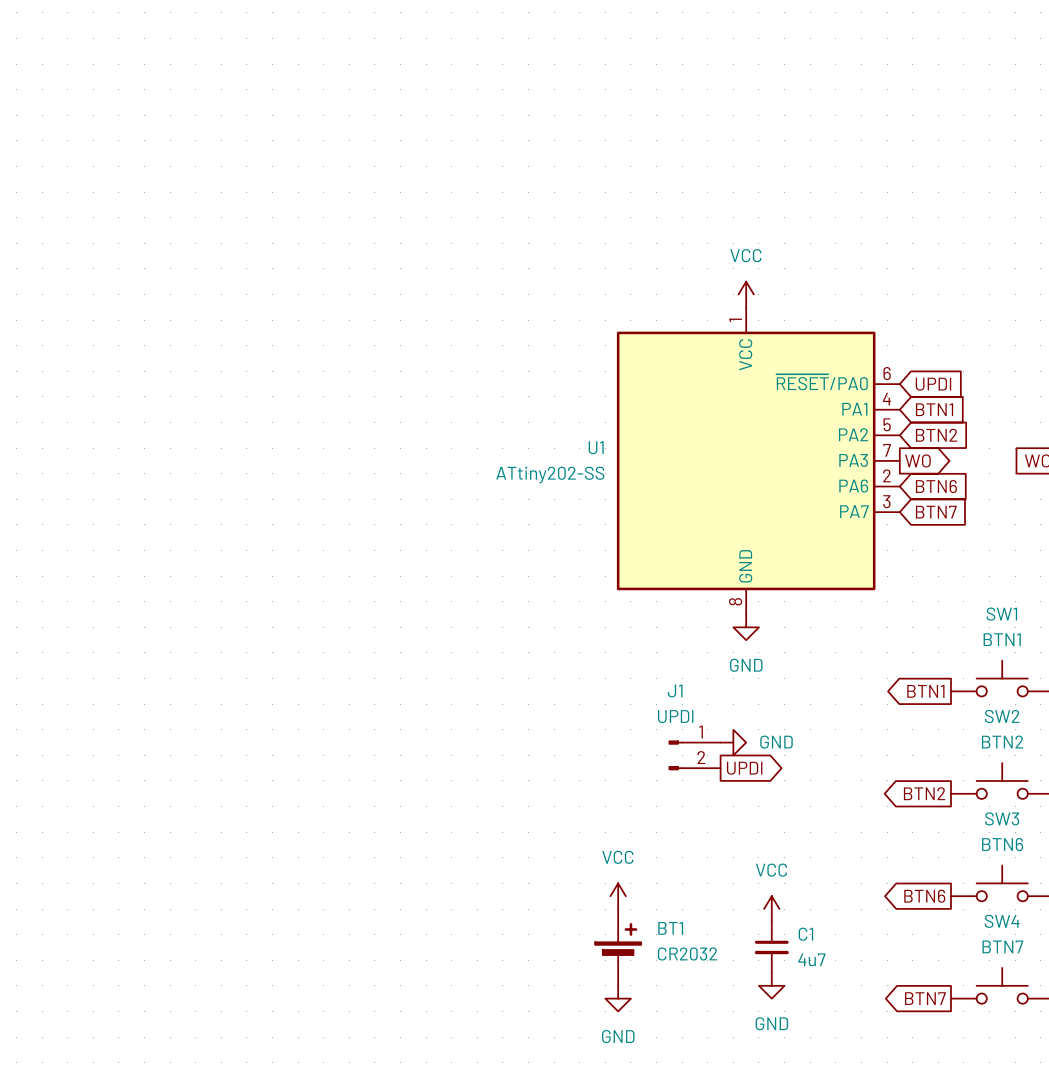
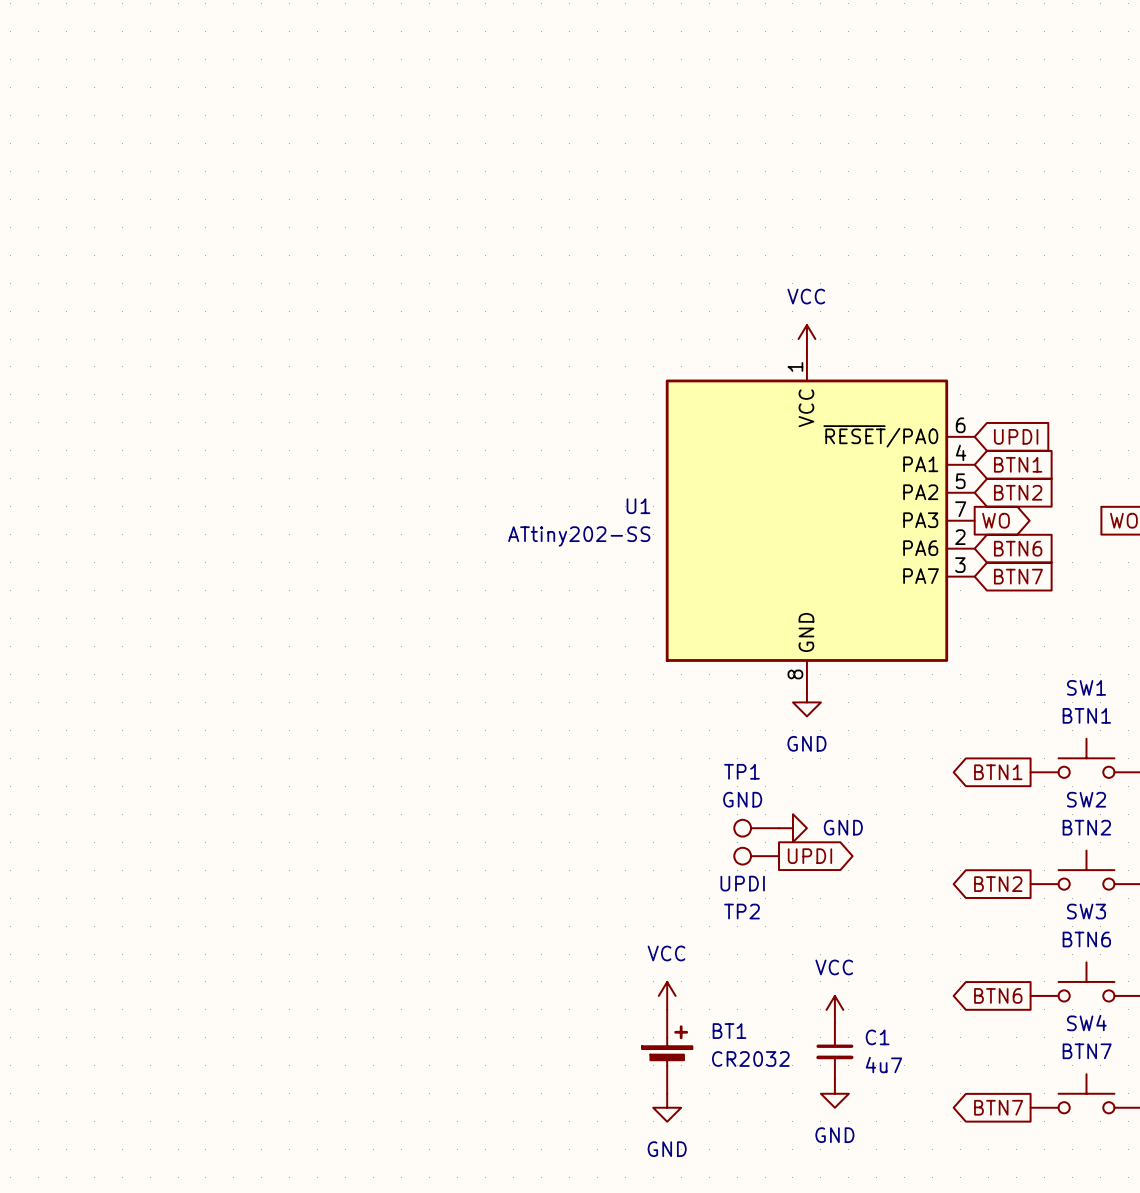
TP1: none -> GND (756, 828)
J1: UPDI (694, 755) -> none
TP2: none -> UPDI (756, 856)

